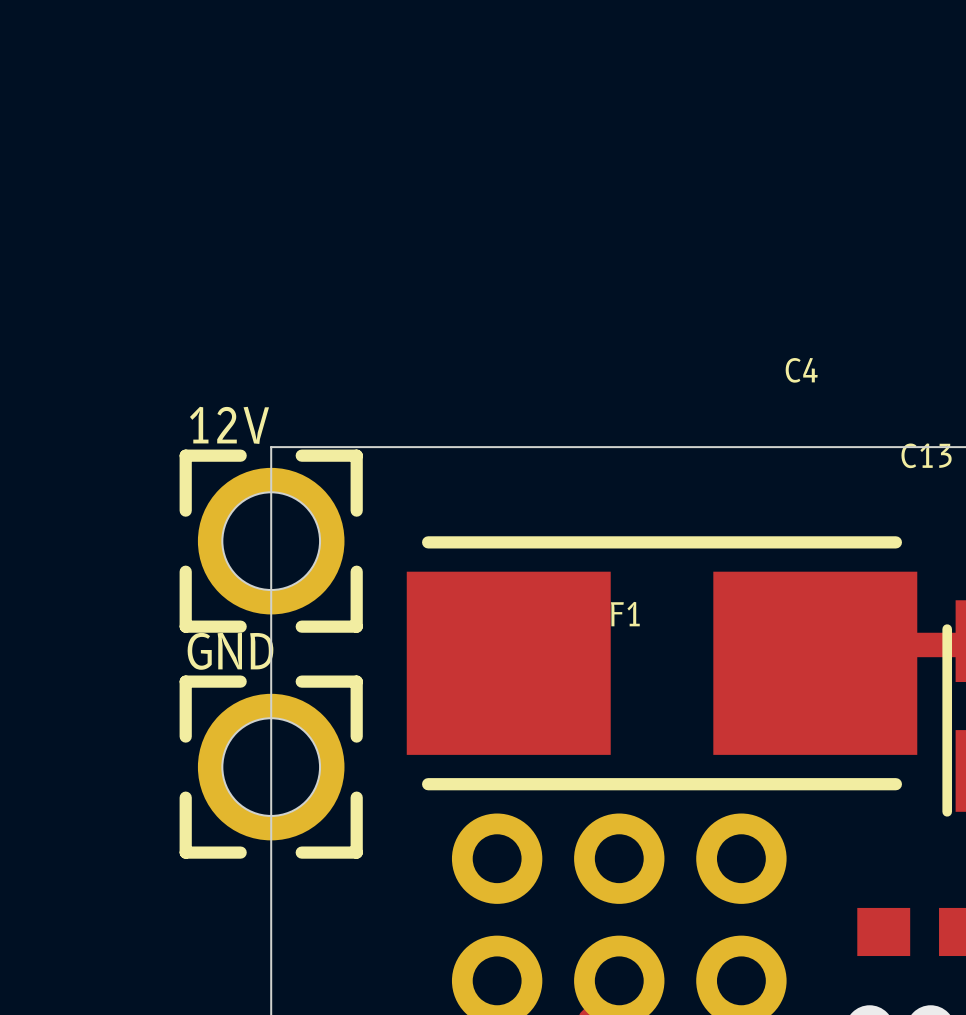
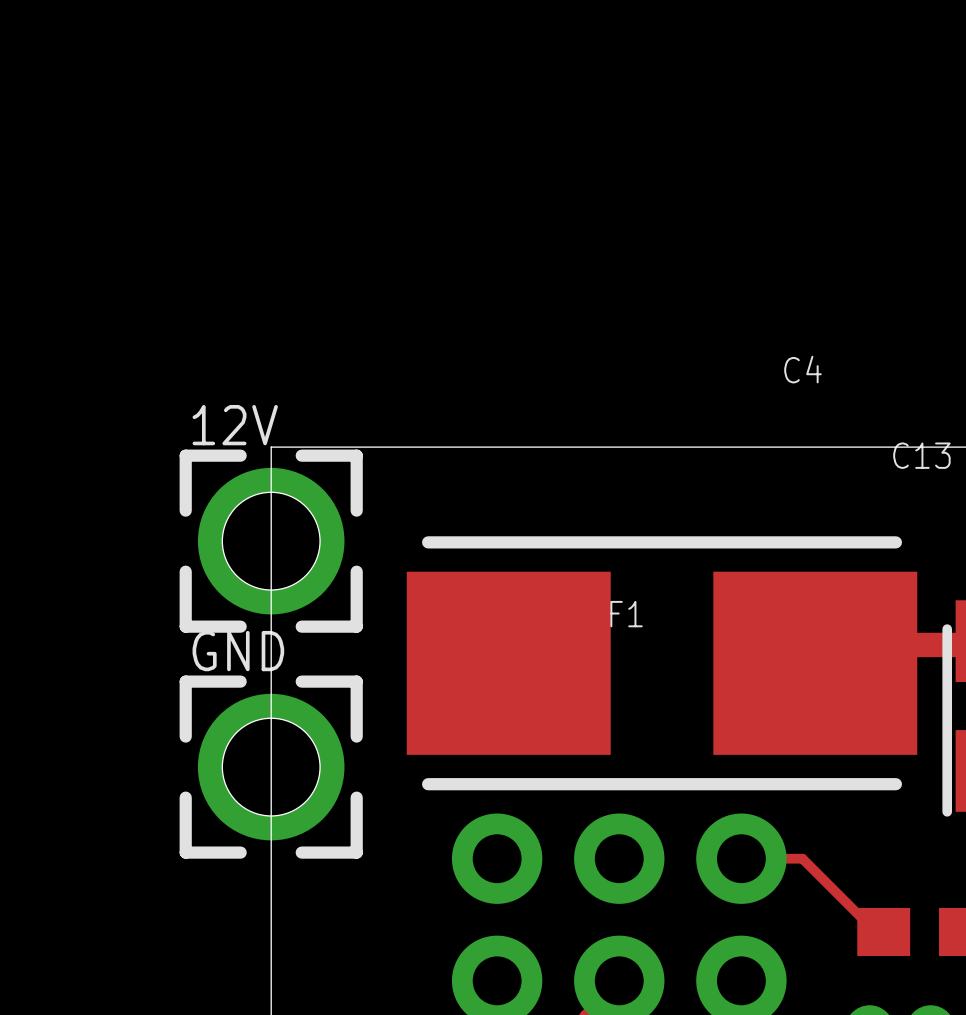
top track: none -> (741, 858) (802, 858) (875, 931)

